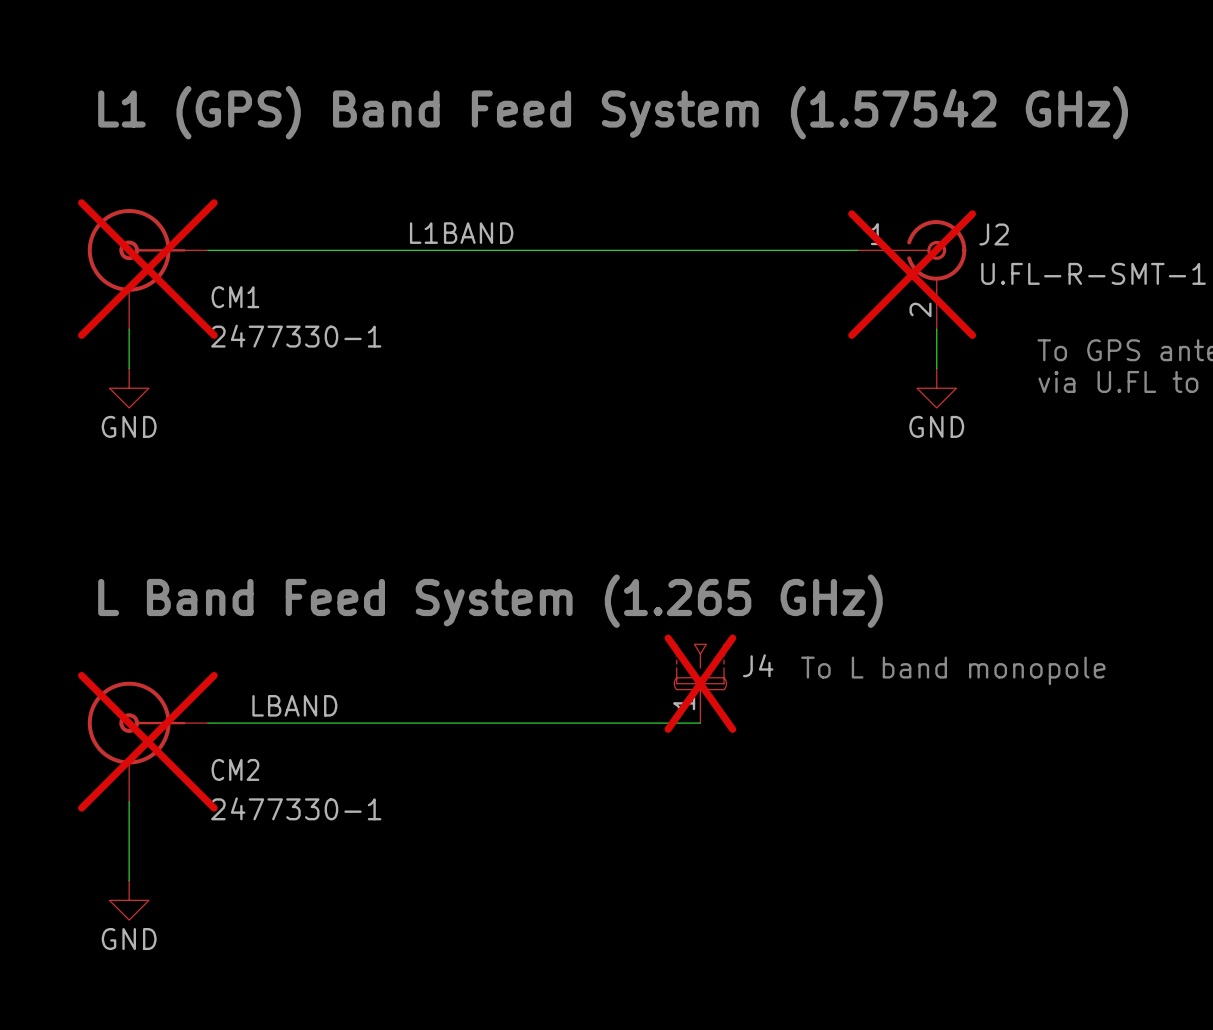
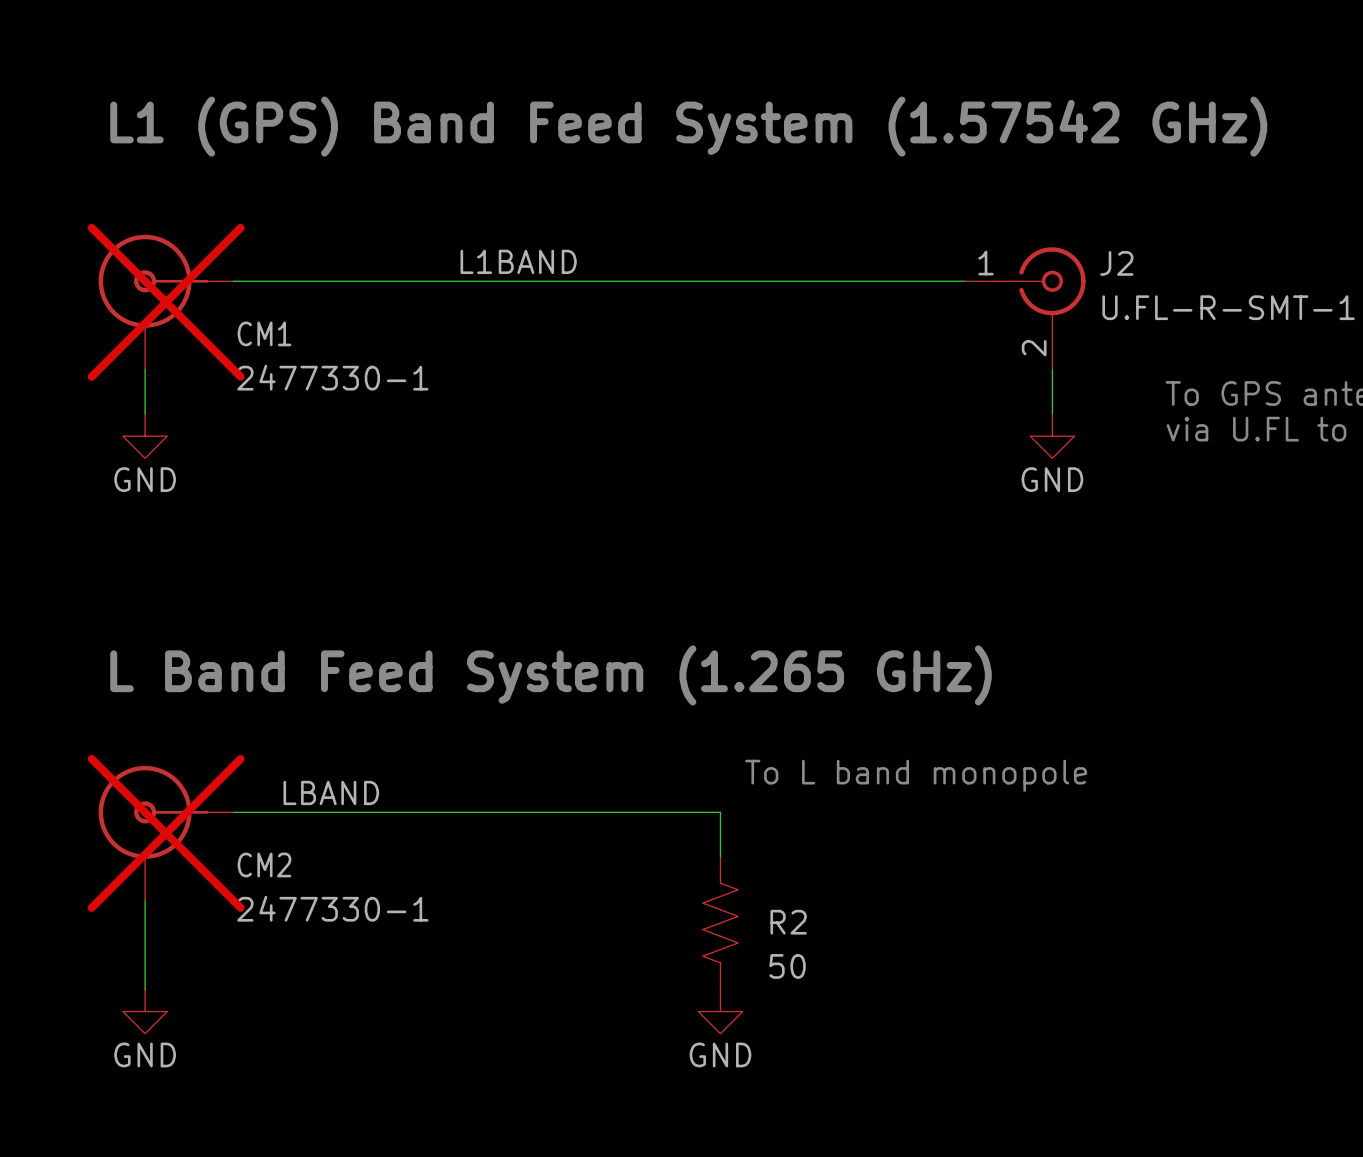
J2 do-not-place cross: (912, 274) -> none
text position: To L band monopole (953, 670) -> To L band monopole (916, 775)
J4: (700, 683) -> none
wire: (641, 723) (700, 723) -> (720, 812) (720, 856)
R2: none -> 50 (720, 923)
power symbol: none -> GND (720, 1011)

